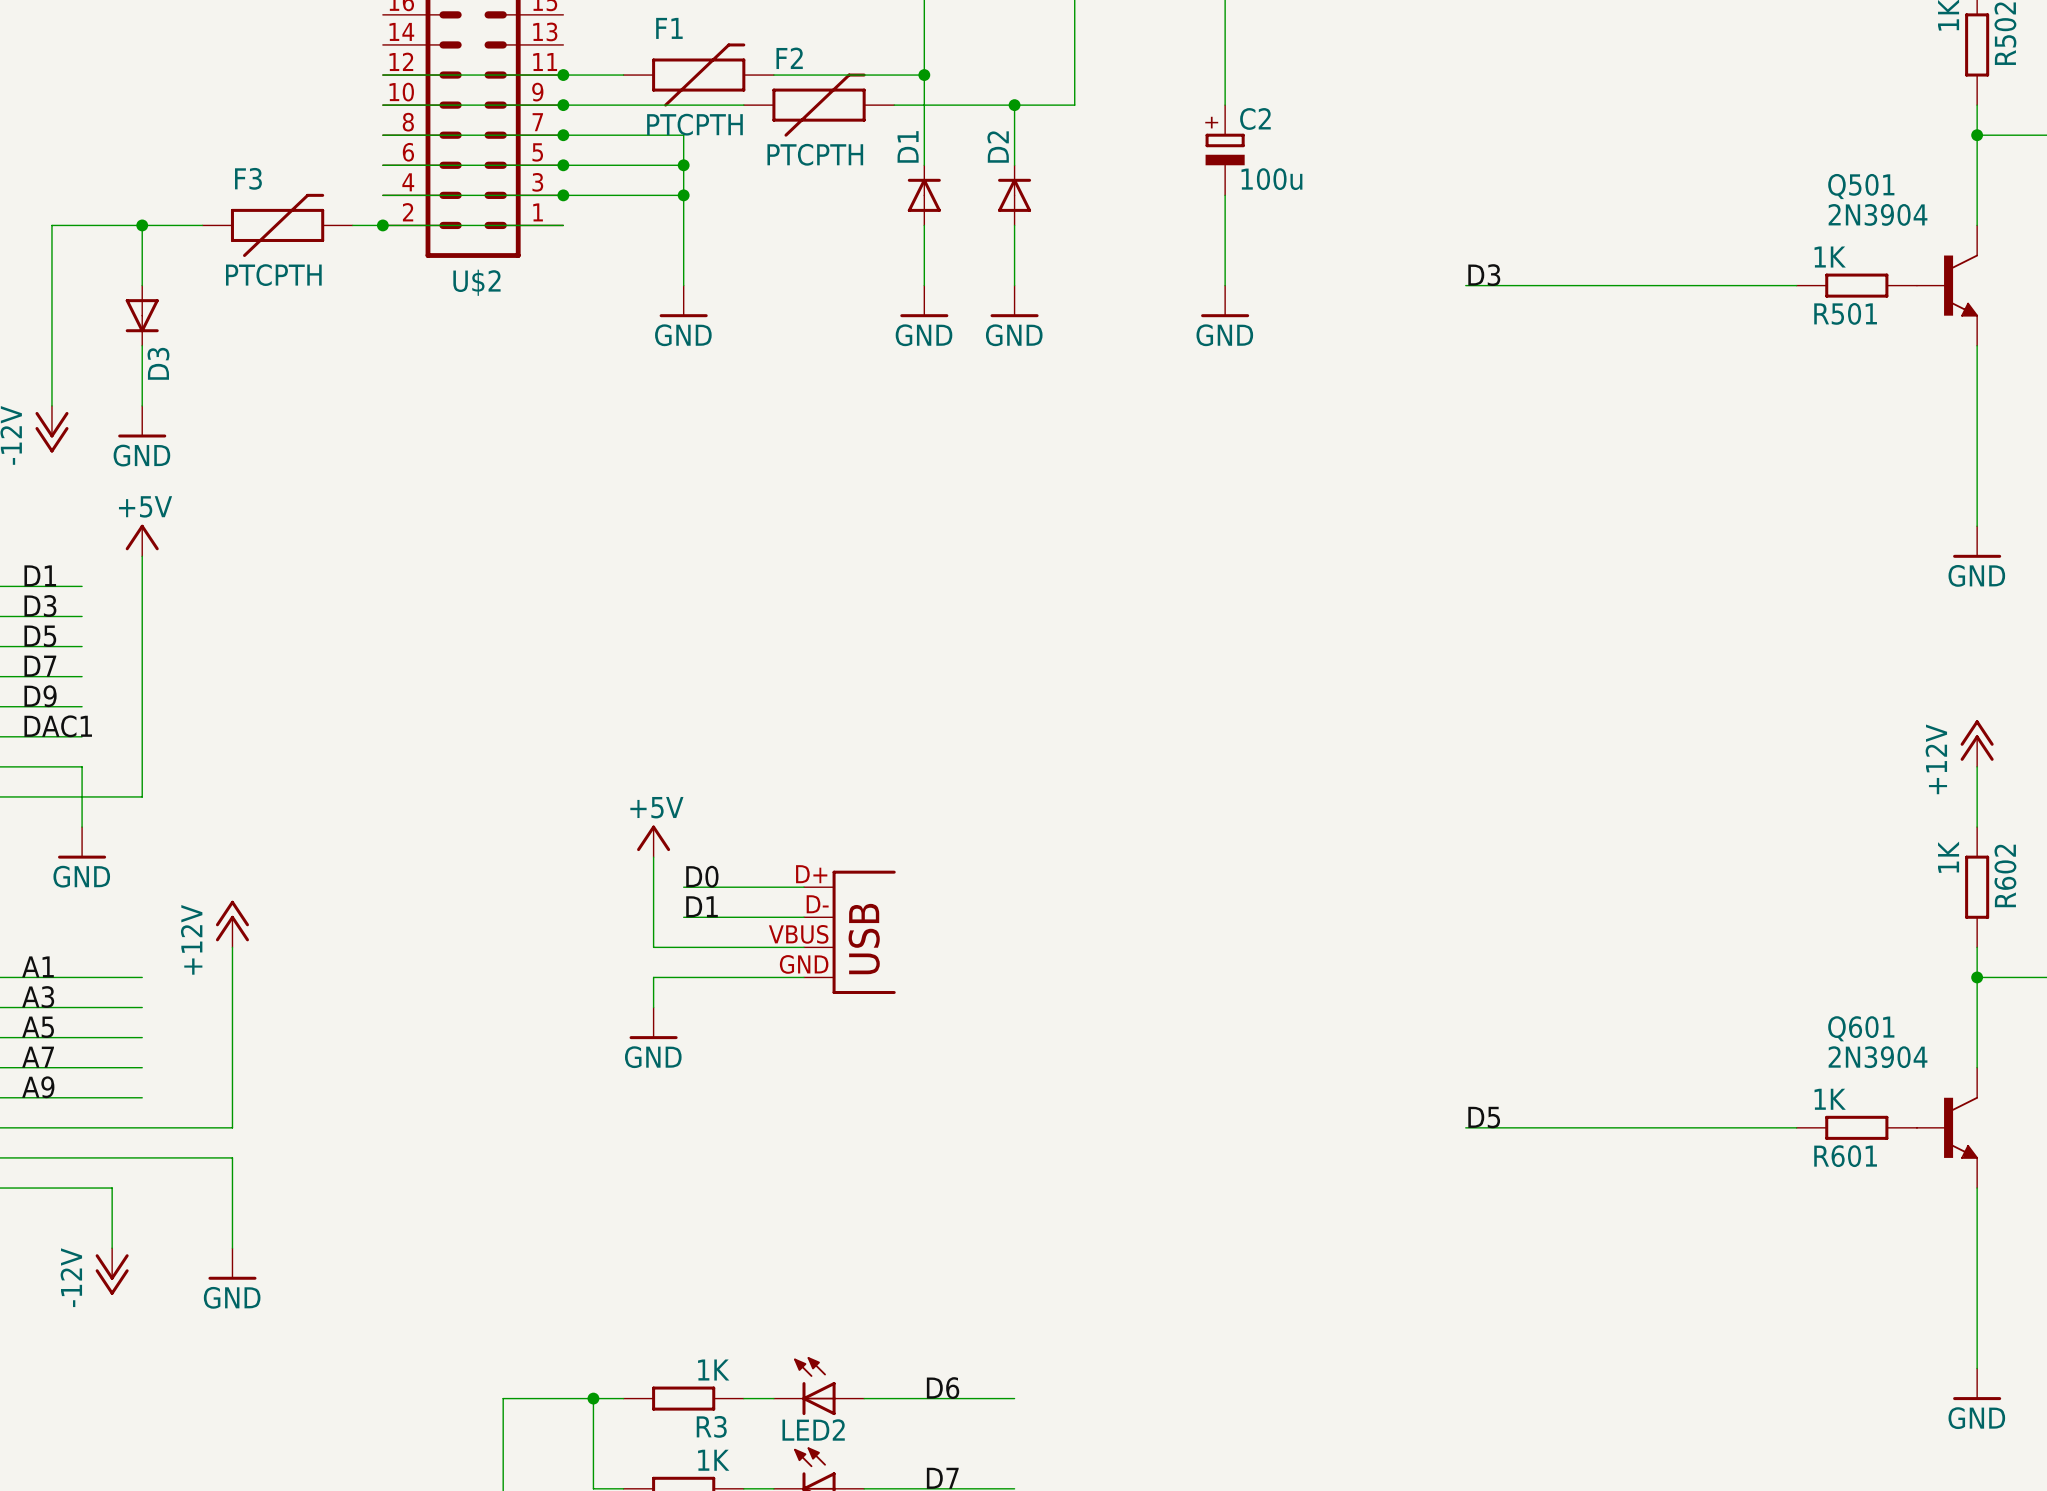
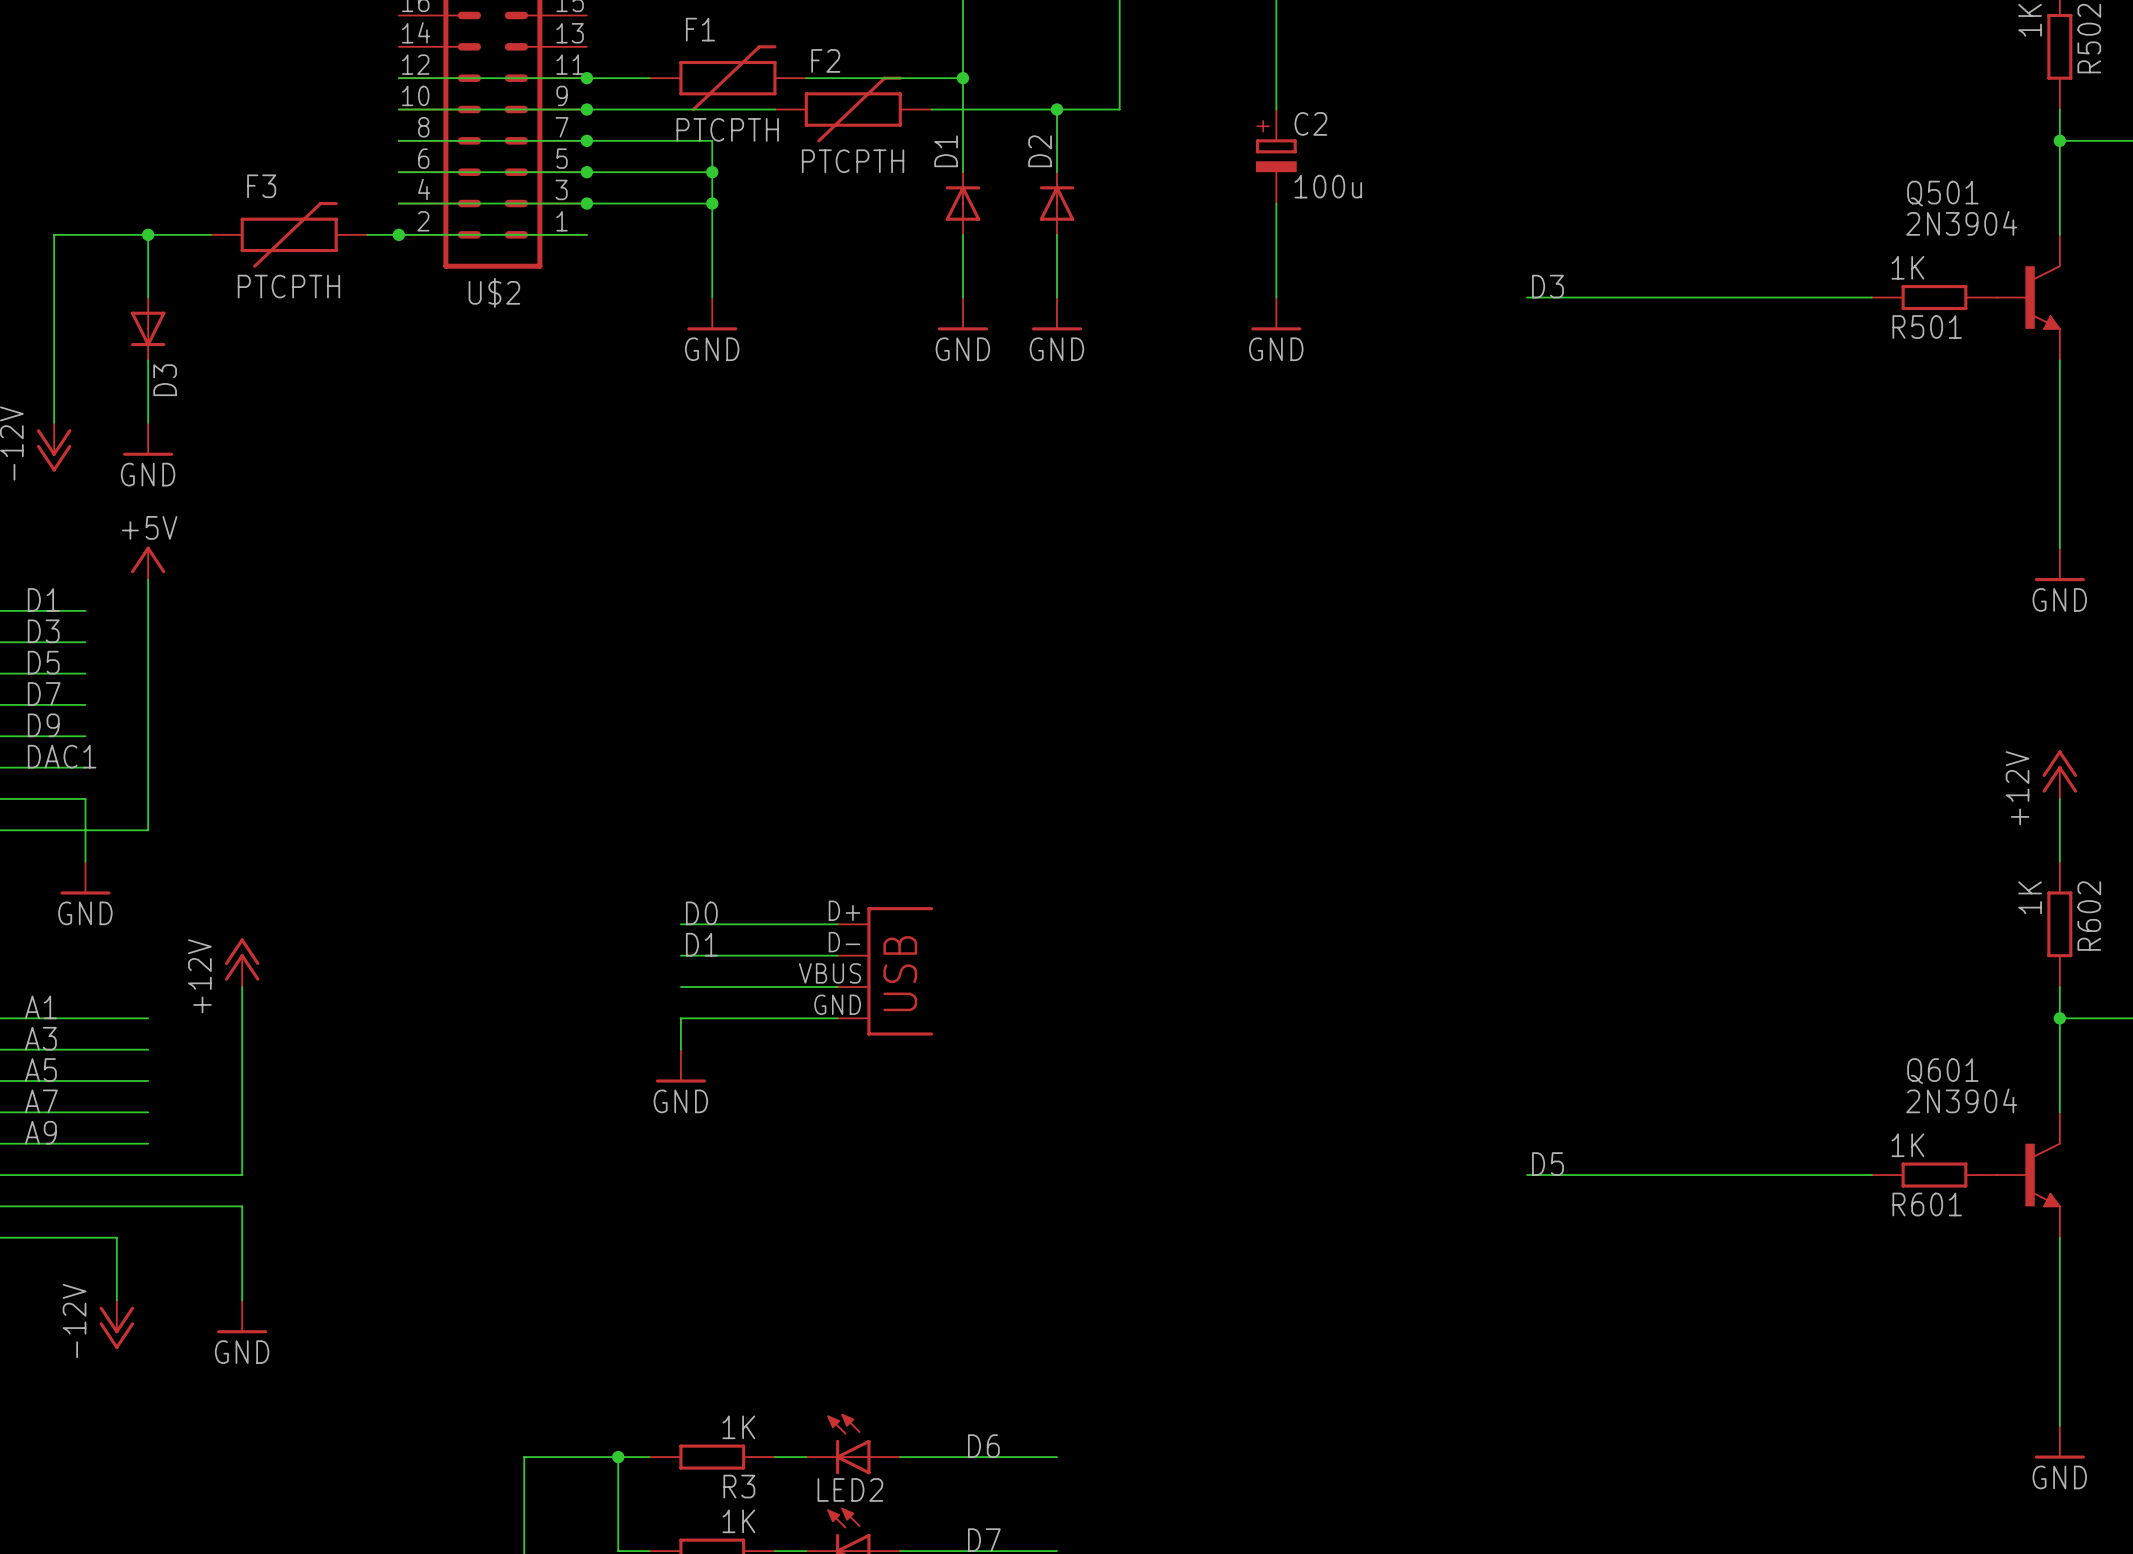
power symbol: +5V (653, 841) -> none
wire: (653, 857) (653, 947) -> none
label position: D0 (702, 876) -> D0 (701, 913)
wire: none -> (680, 924) (712, 924)
label position: D1 (702, 906) -> D1 (701, 944)
wire: none -> (680, 955) (712, 955)

